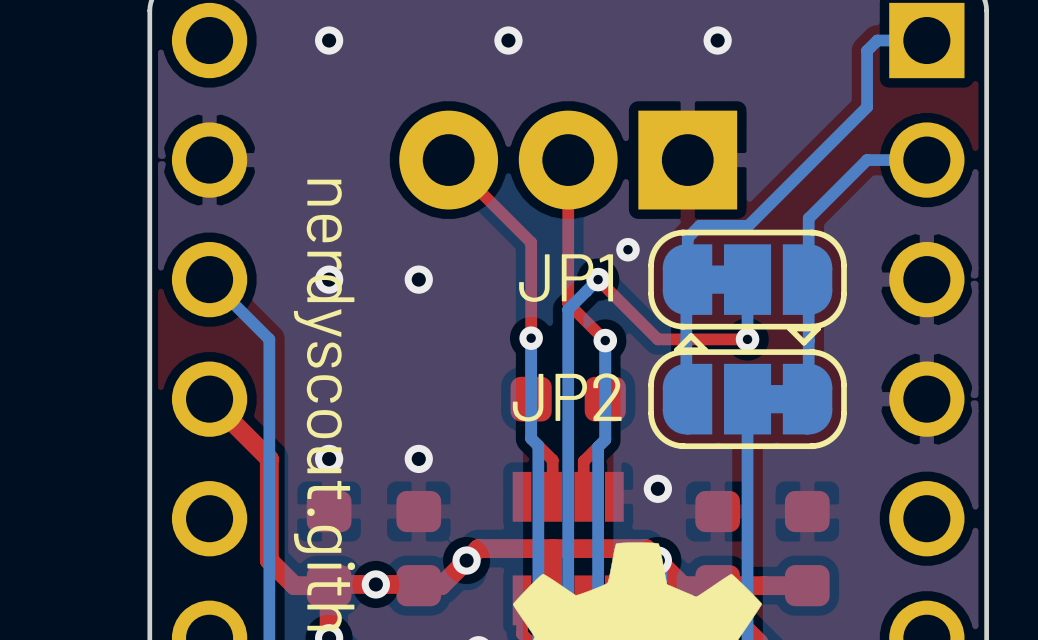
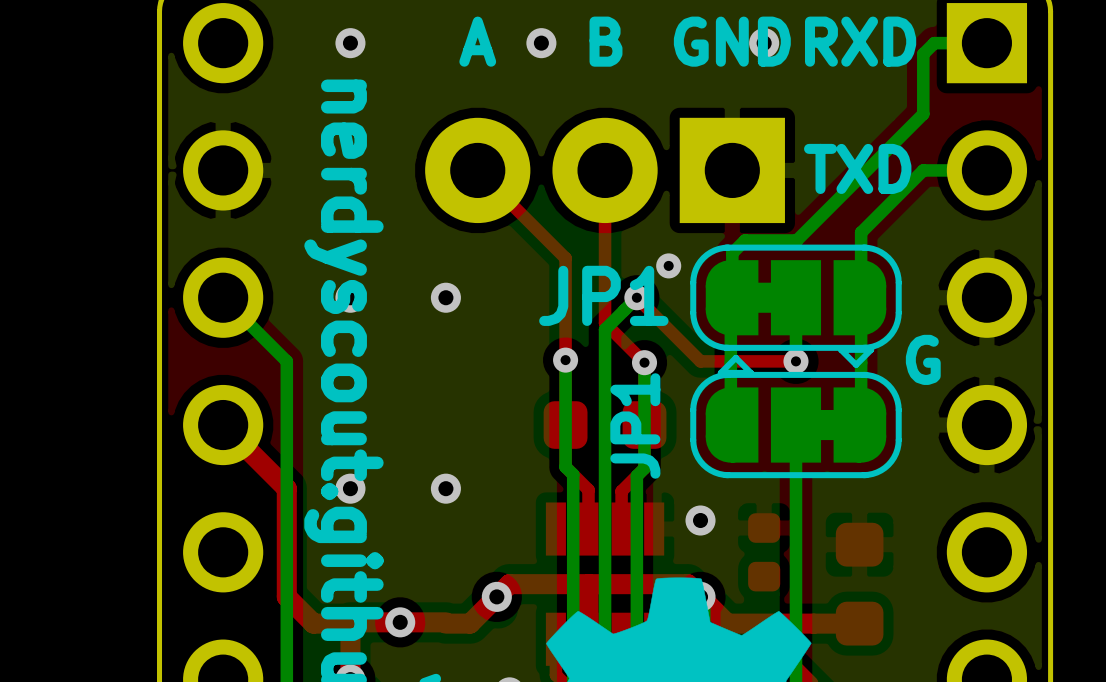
text: none -> A (477, 41)
text: none -> B (606, 41)
text: none -> GND (732, 41)
text: none -> RXD (860, 41)
text: none -> TXD (857, 168)
text: none -> G (923, 359)
JP2 name: JP2 (567, 397) -> JP1 (635, 425)
part footprint: [695, 490, 741, 607] -> [748, 513, 781, 592]
part: (329, 548) -> none
part: (418, 548) -> none

